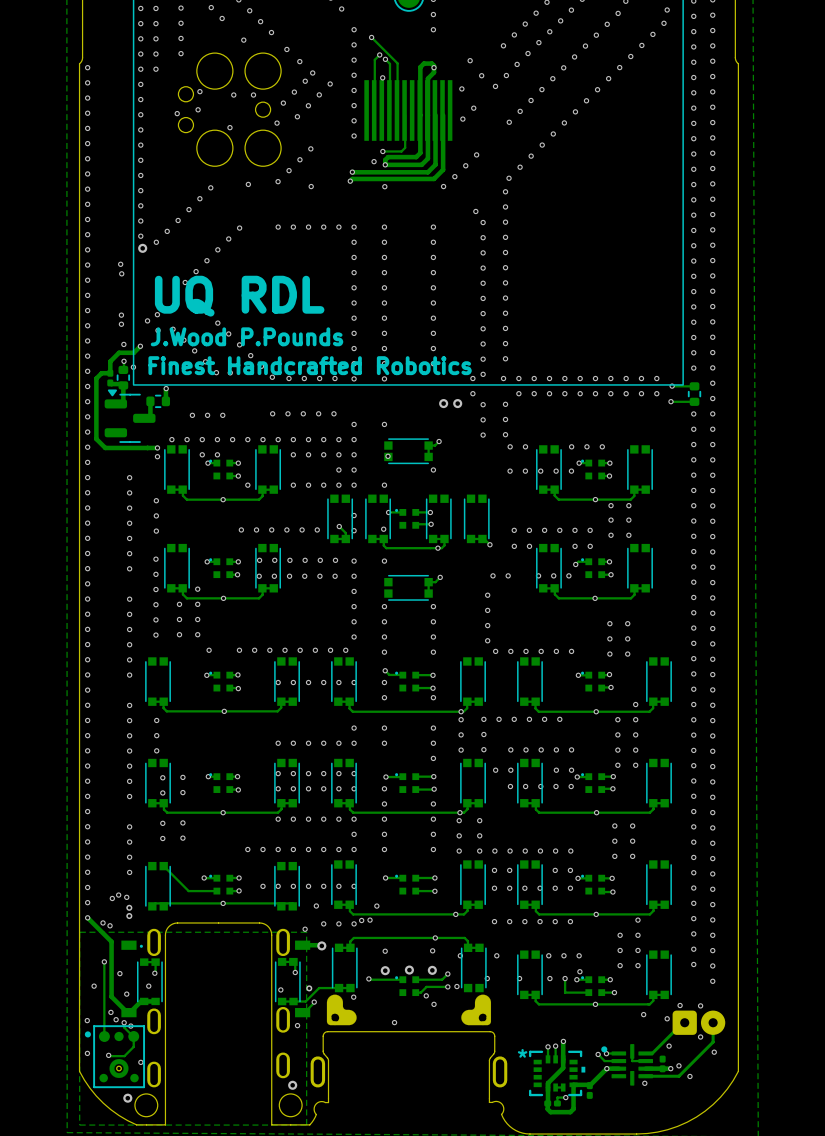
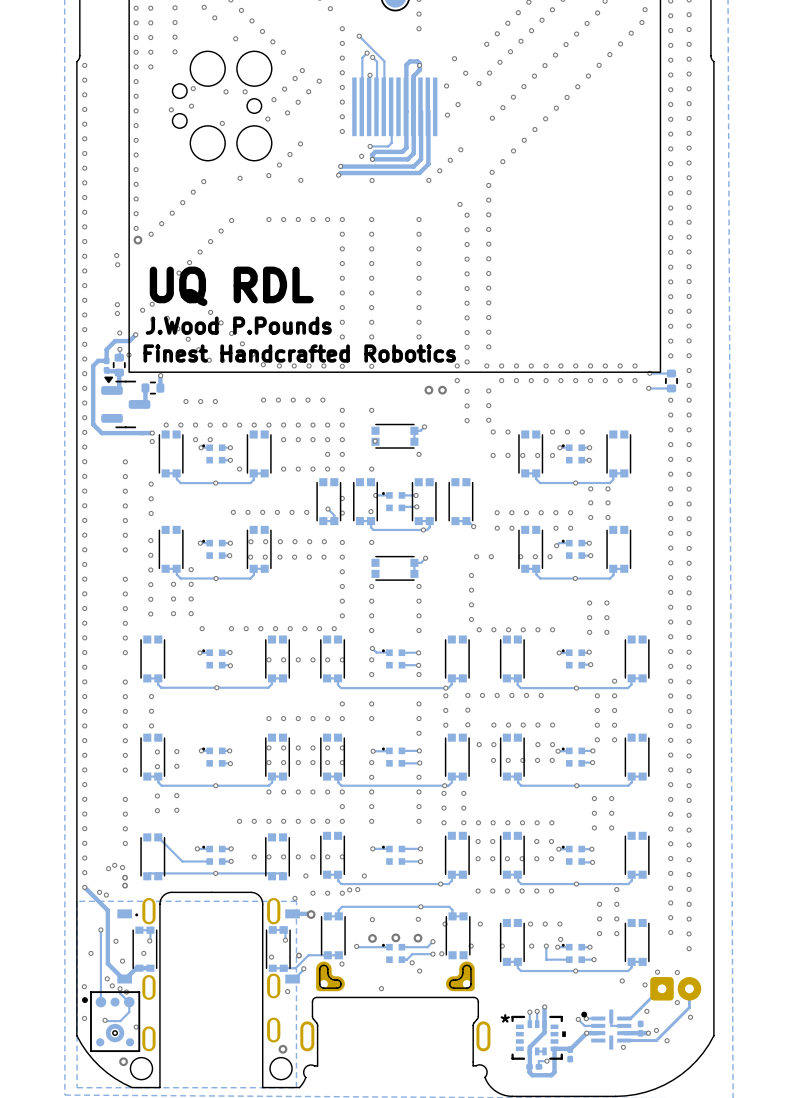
via: none -> (272, 41)
via: (286, 49) -> none
via: none -> (283, 52)
via: (299, 61) -> none

